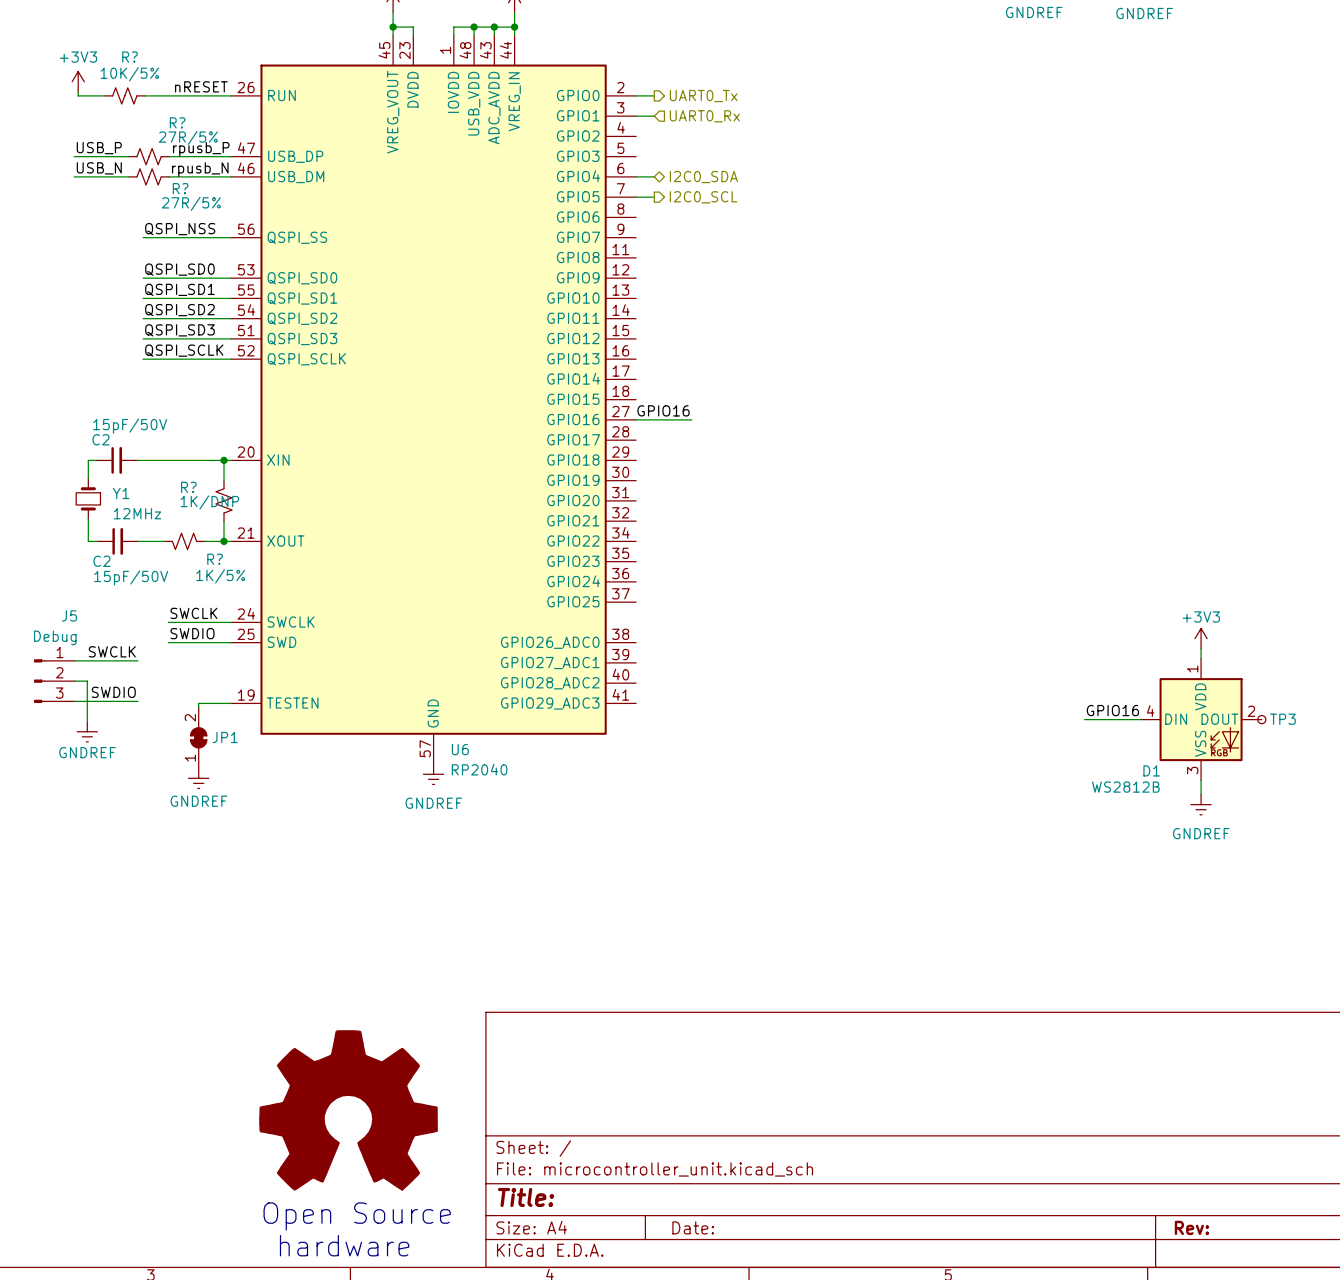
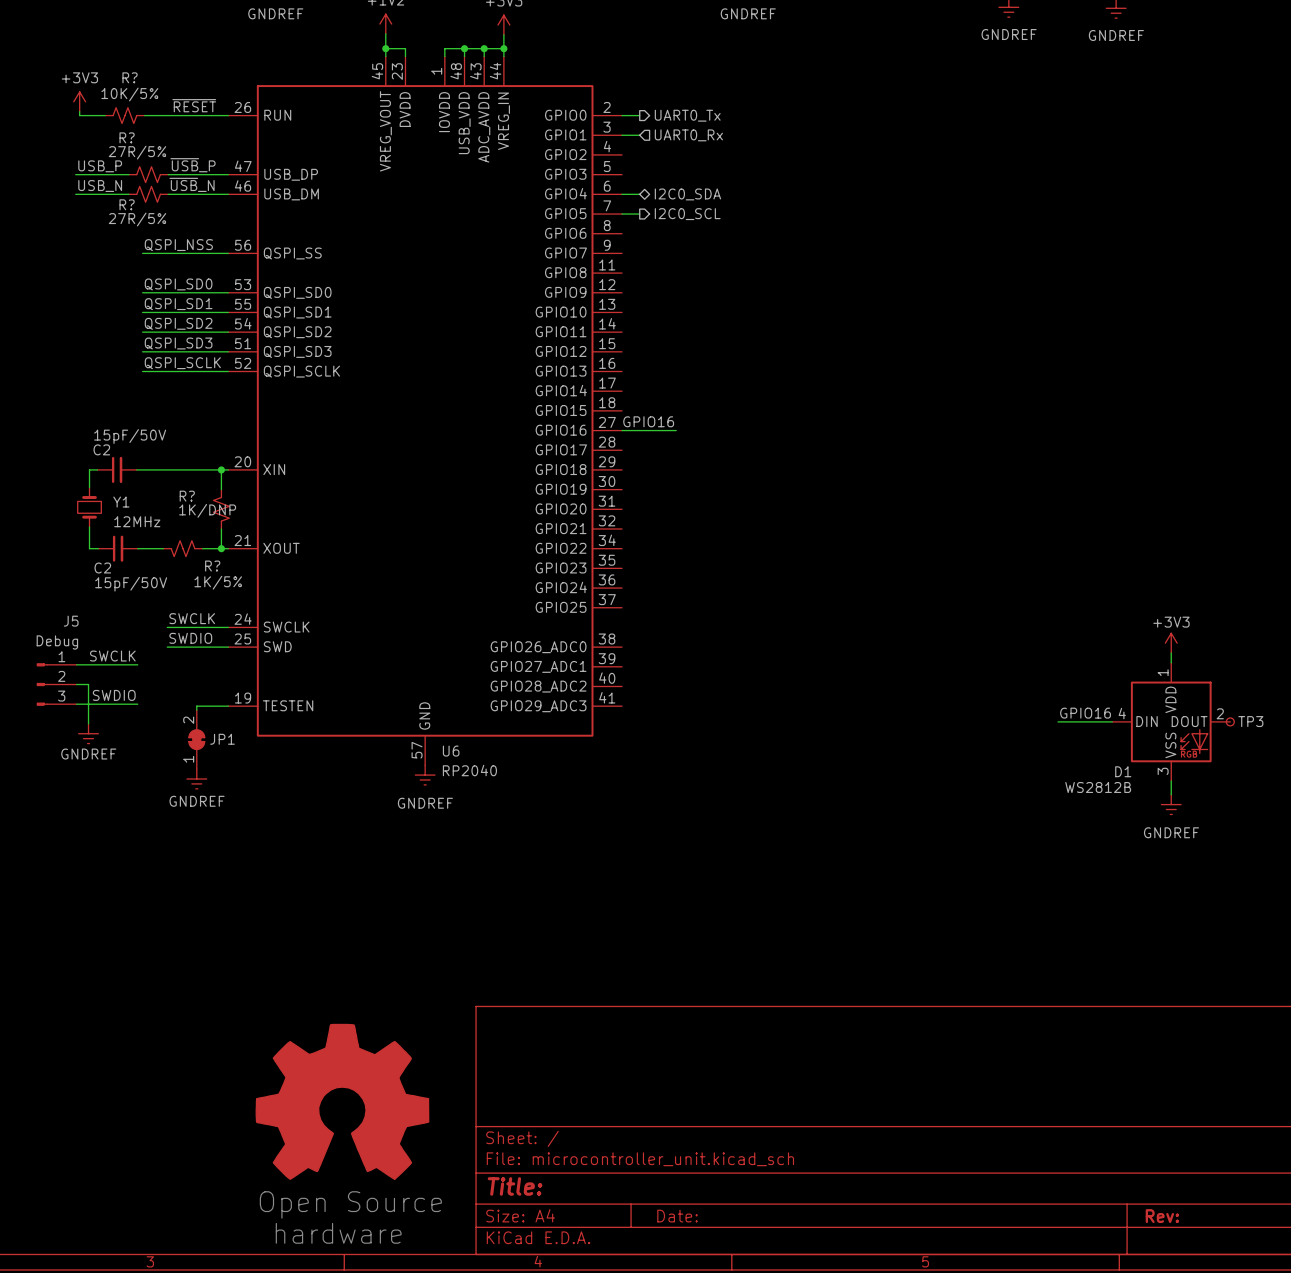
label: nRESET (201, 86) -> ~{RESET} (194, 105)
R? name position: R? (177, 122) -> R? (127, 137)
R? value position: 27R/5% (188, 138) -> 27R/5% (137, 152)
label: rpusb_P (201, 149) -> ~{USB}_P (193, 165)
label: rpusb_N (200, 169) -> ~{USB}_N (192, 184)
R? name position: R? (180, 188) -> R? (127, 204)
R? value position: 27R/5% (191, 203) -> 27R/5% (137, 219)

